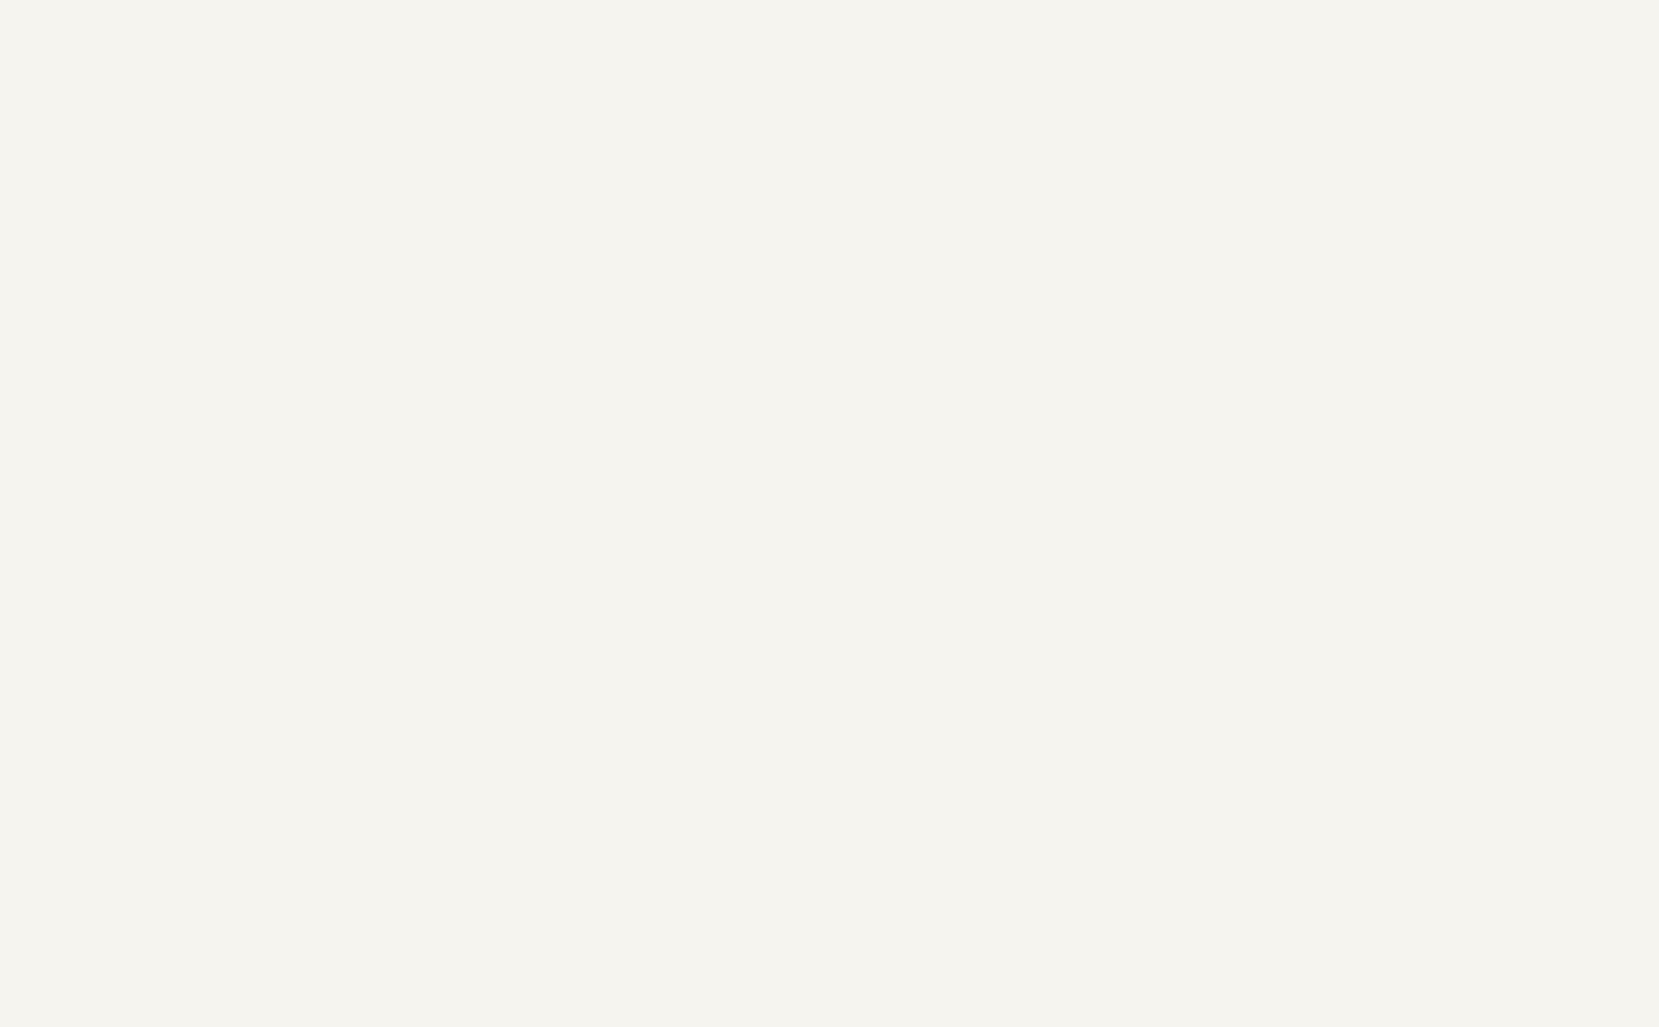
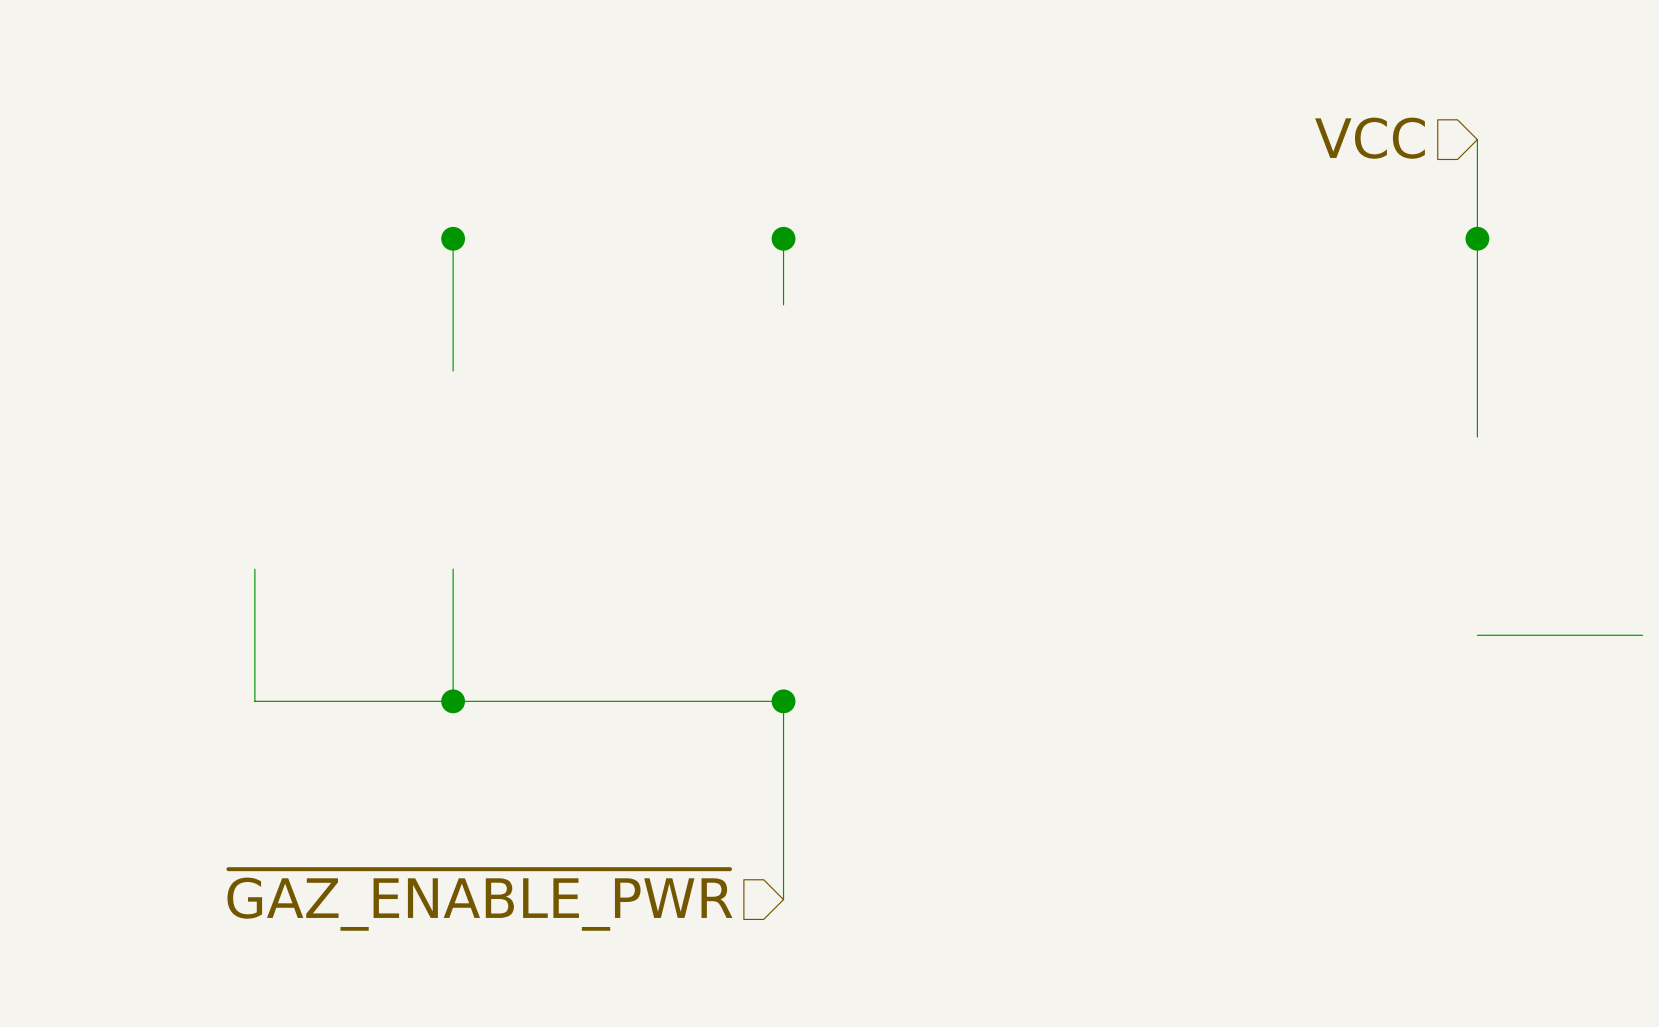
hierarchical label: none -> VCC (1370, 138)
wire: none -> (1477, 139) (1477, 437)
wire: none -> (453, 238) (453, 370)
junction: none -> (453, 238)
wire: none -> (783, 238) (783, 304)
junction: none -> (783, 238)
junction: none -> (1477, 238)
wire: none -> (254, 569) (254, 701) (783, 701) (783, 899)
wire: none -> (453, 569) (453, 701)
wire: none -> (1477, 635) (1642, 635)
junction: none -> (453, 701)
junction: none -> (783, 701)
hierarchical label: none -> ~{GAZ_ENABLE_PWR} (479, 899)

